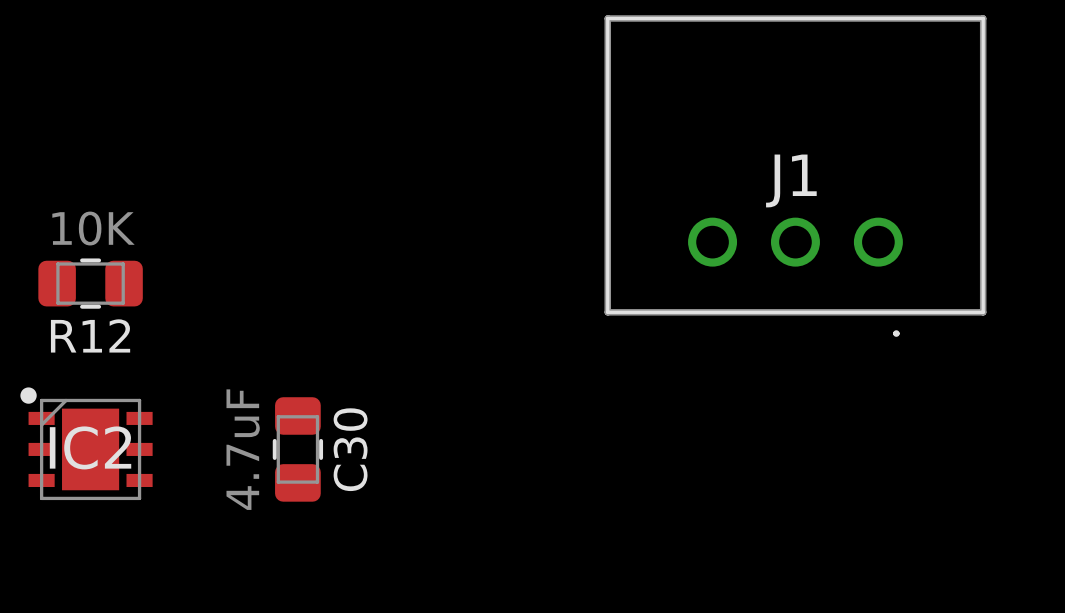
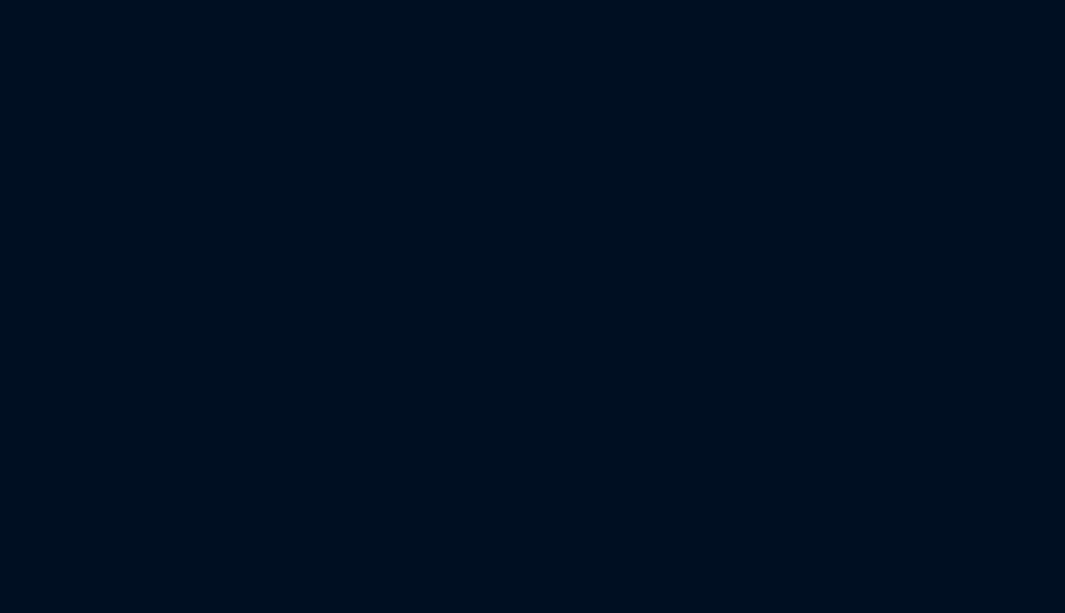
J1: (795, 176) -> none
R12: 10K (90, 283) -> none
IC2: (86, 443) -> none
C30: 4.7uF (297, 449) -> none

